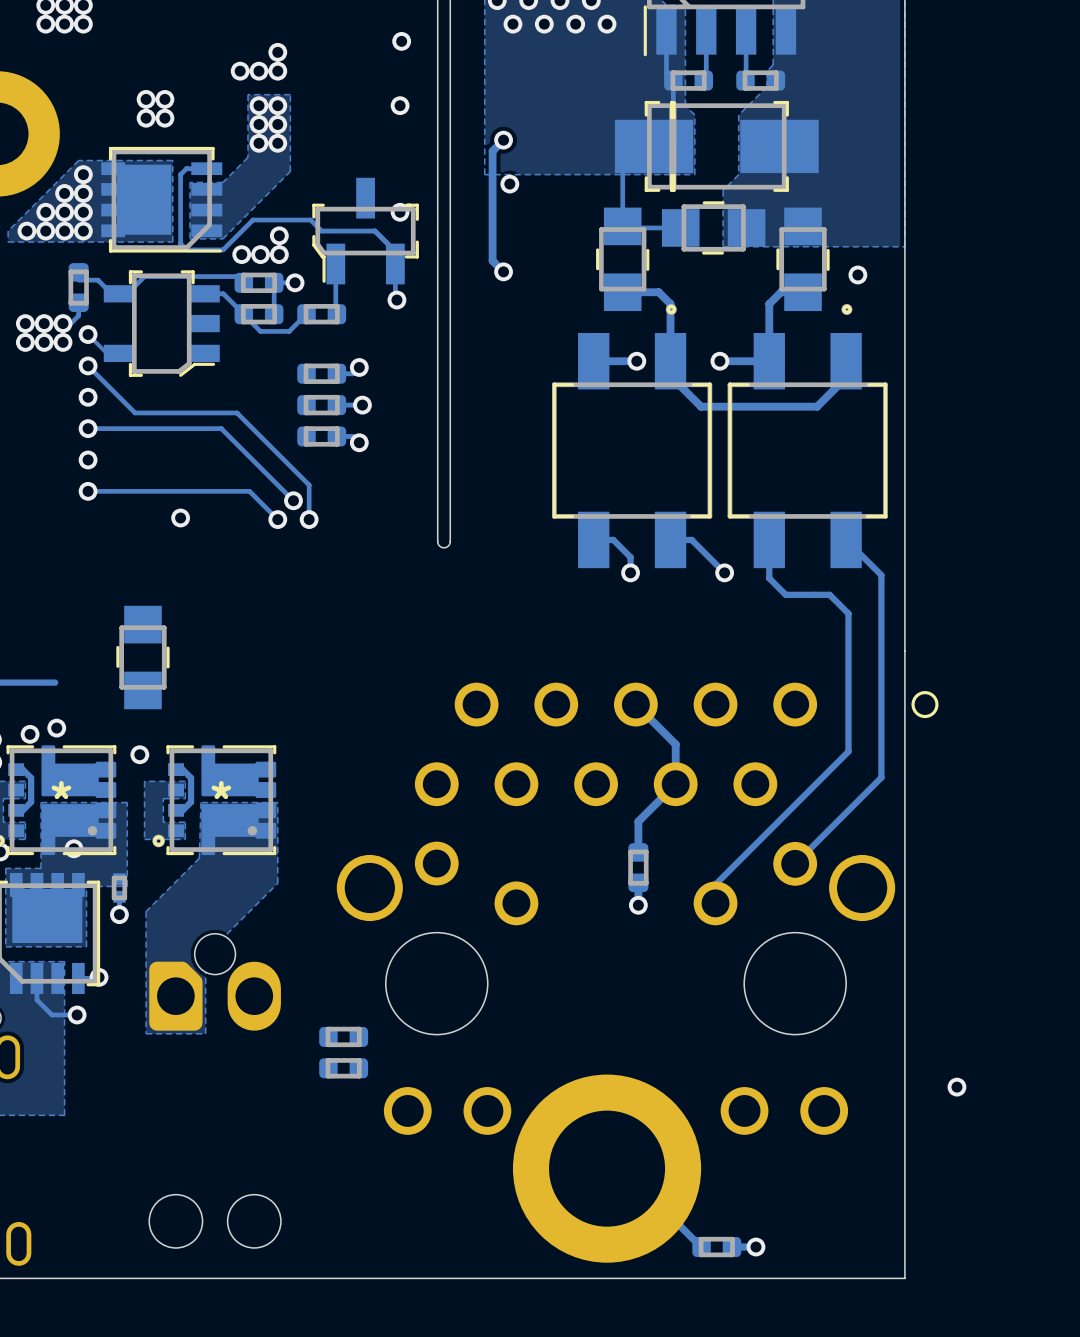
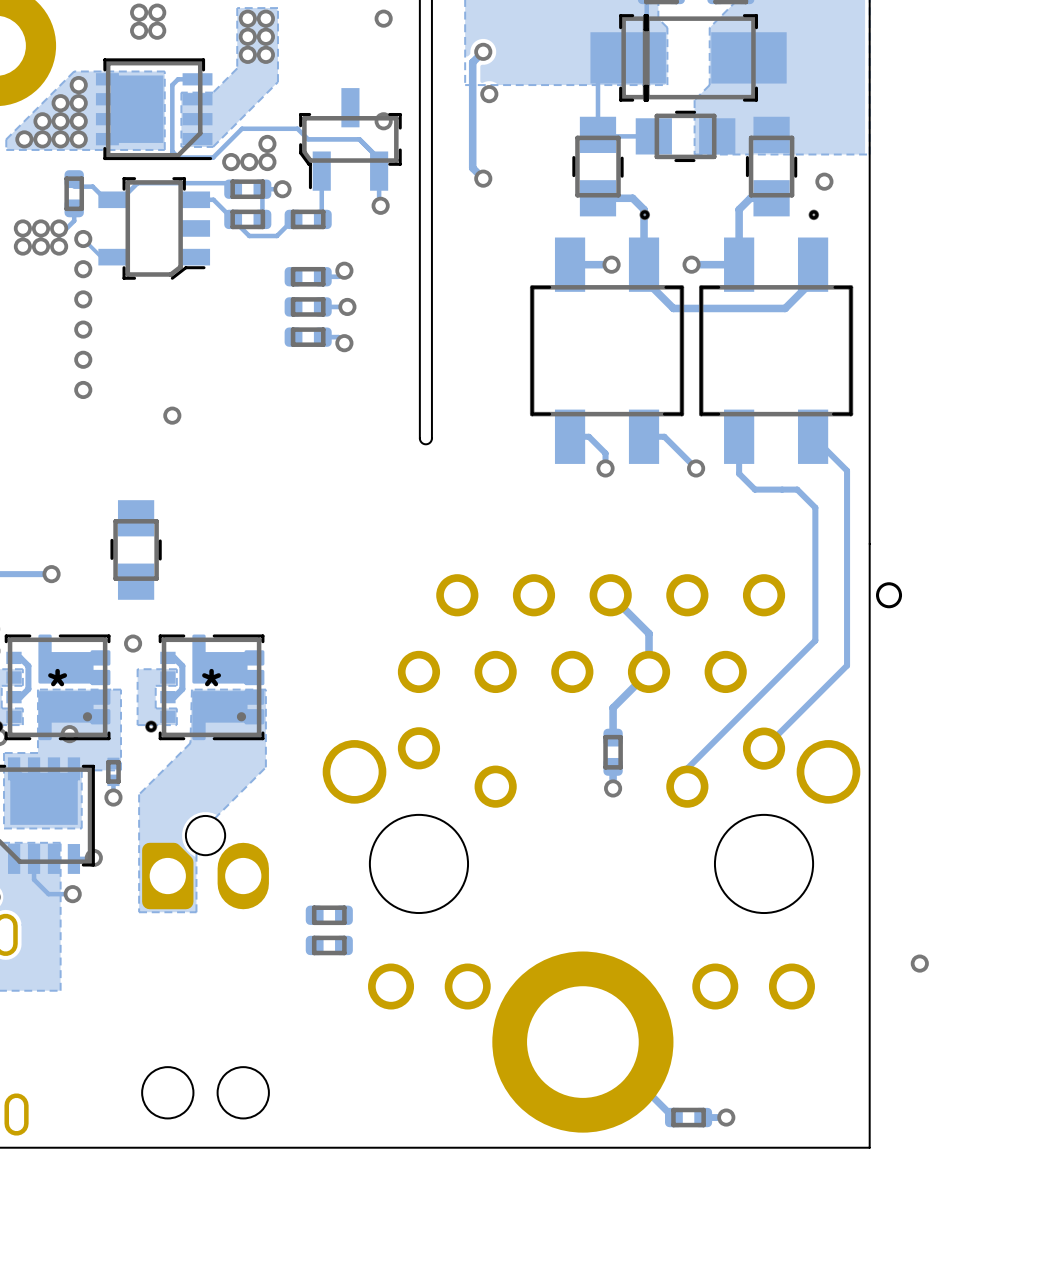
track: (88, 365) (135, 412) (237, 412) (309, 485) (309, 519) -> none
track: (88, 428) (221, 428) (293, 500) -> none
track: (88, 491) (249, 491) (277, 519) -> none
via: (293, 500) -> none
via: (277, 519) -> none
via: (309, 519) -> none
via: none -> (51, 574)
via: (56, 728) -> none
via: (30, 734) -> none

